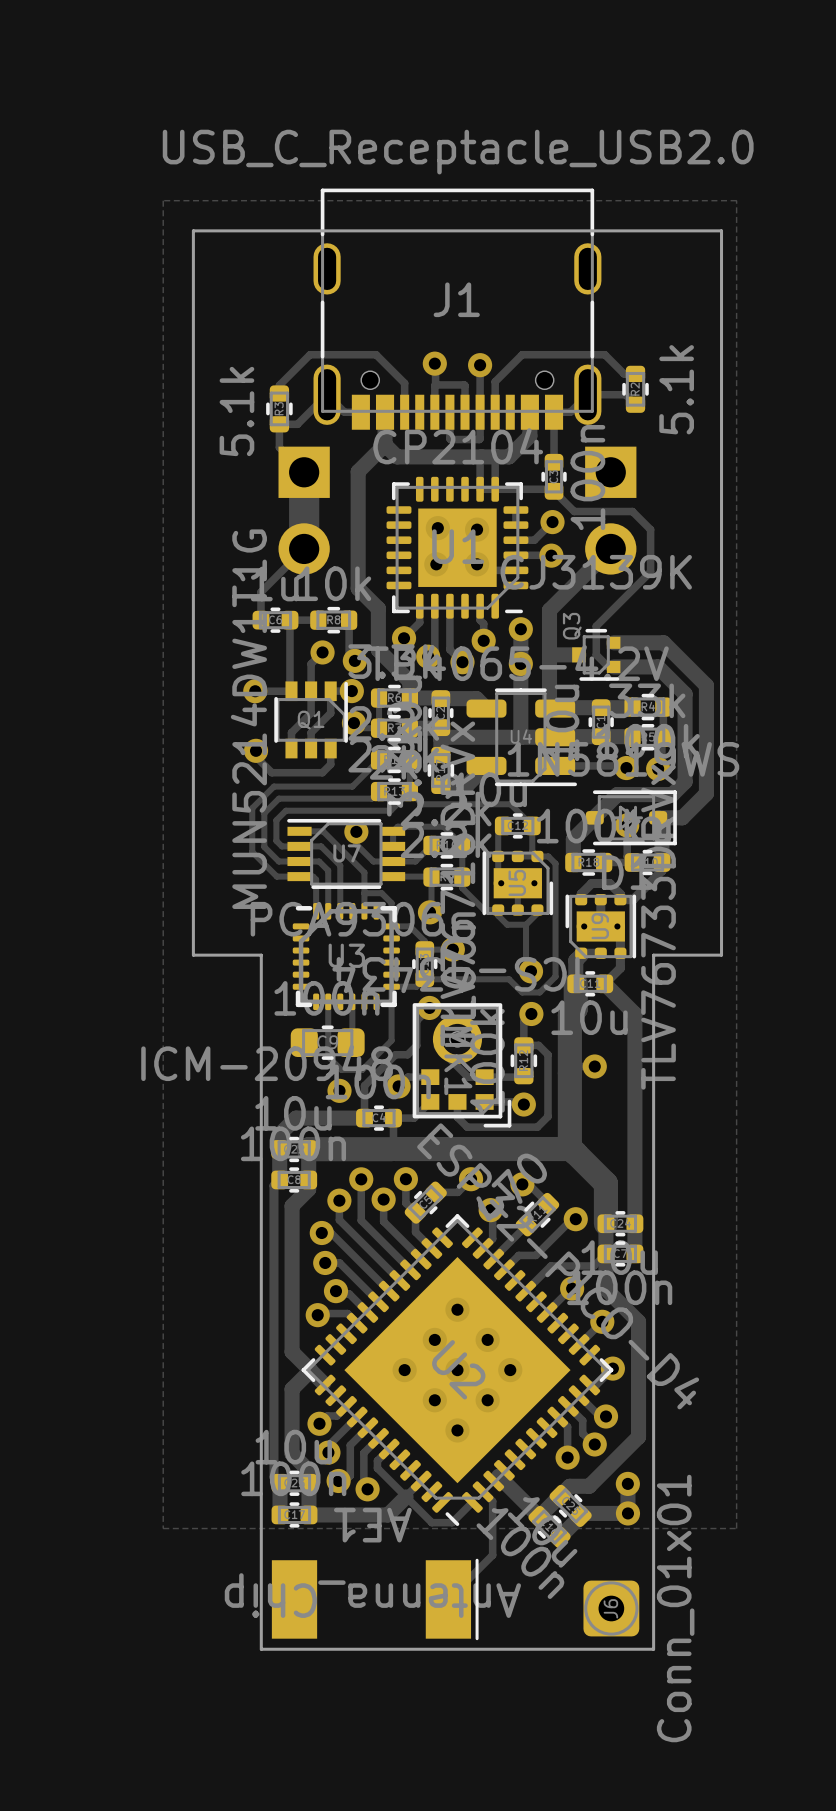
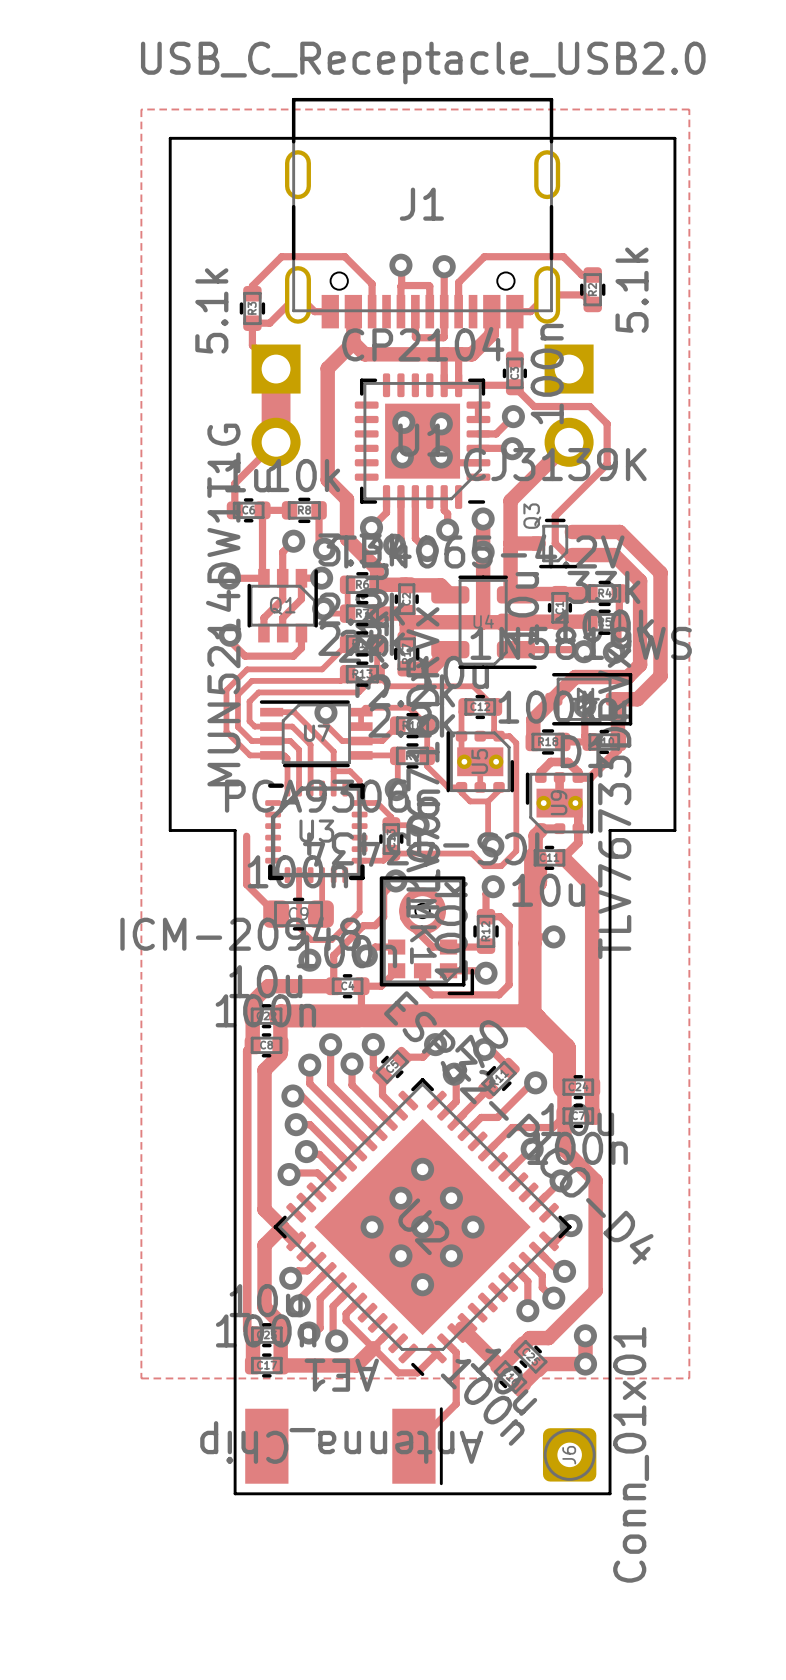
track: none -> (246, 836) (246, 884) (276, 914)

